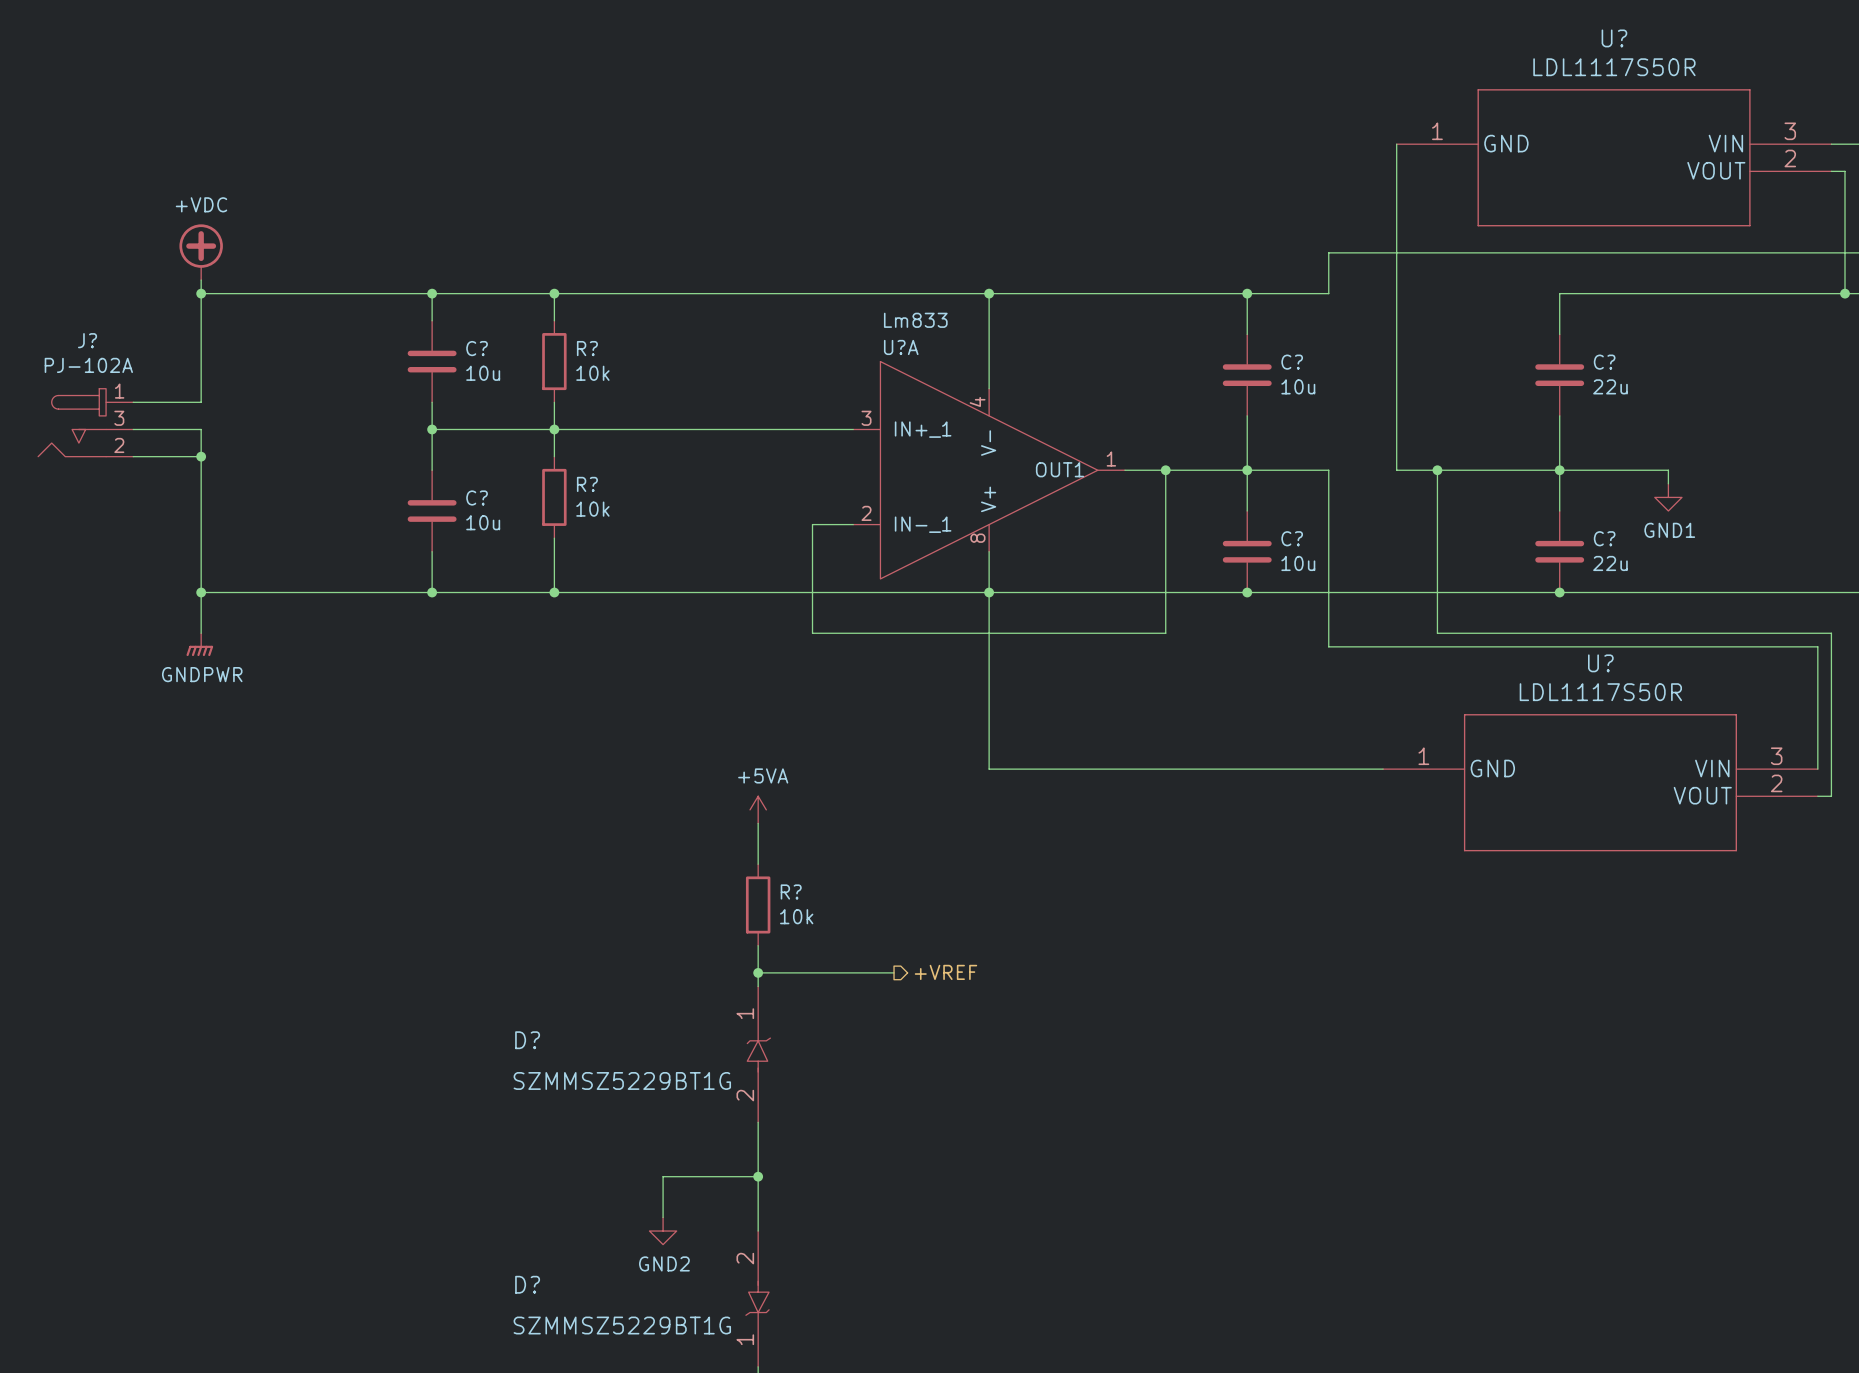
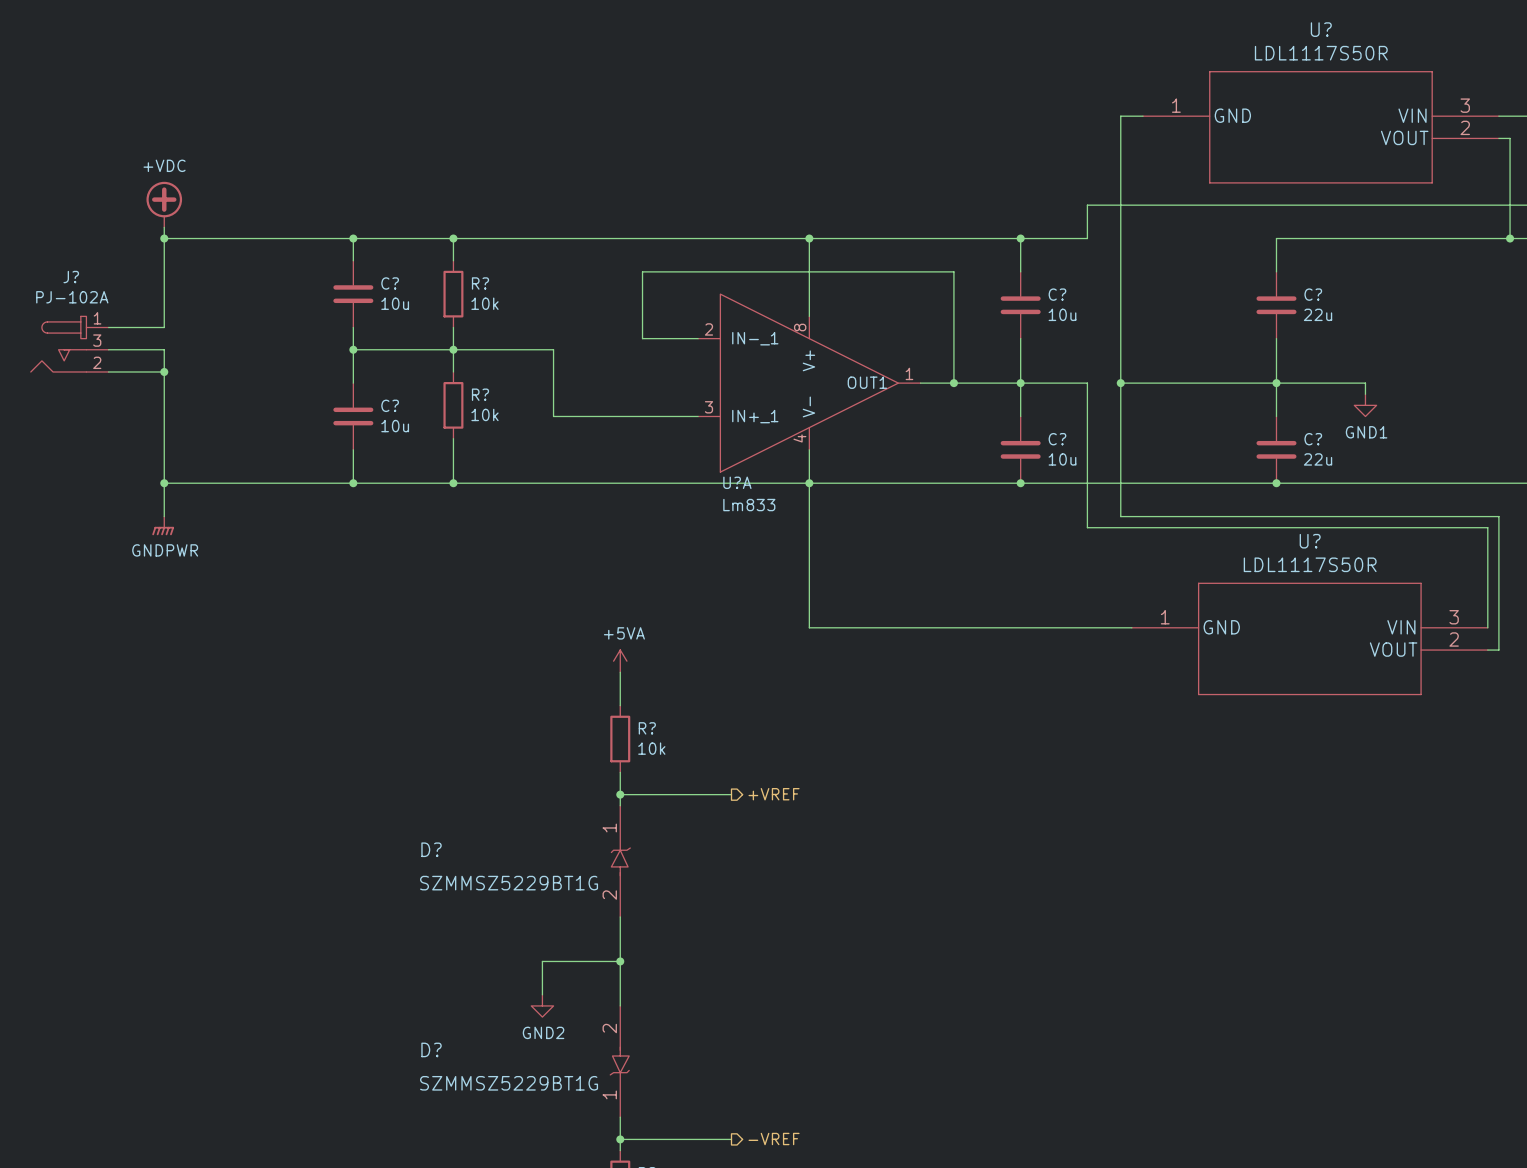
wire: (1396, 144) (1396, 470) -> (1143, 116) (1120, 116) (1120, 516) (1176, 516)
wire: (676, 429) (853, 429) -> (553, 349) (553, 416) (698, 416)
U?A flip: as is (989, 470) -> up-down (809, 383)
wire: (1165, 470) (1165, 633) (812, 633) (812, 524) (853, 524) -> (953, 383) (953, 271) (642, 271) (642, 338) (698, 338)
wire: none -> (1120, 383) (1143, 383)
junction: none -> (1120, 383)
wire: (1437, 470) (1437, 633) -> none
junction: (1437, 470) -> none

